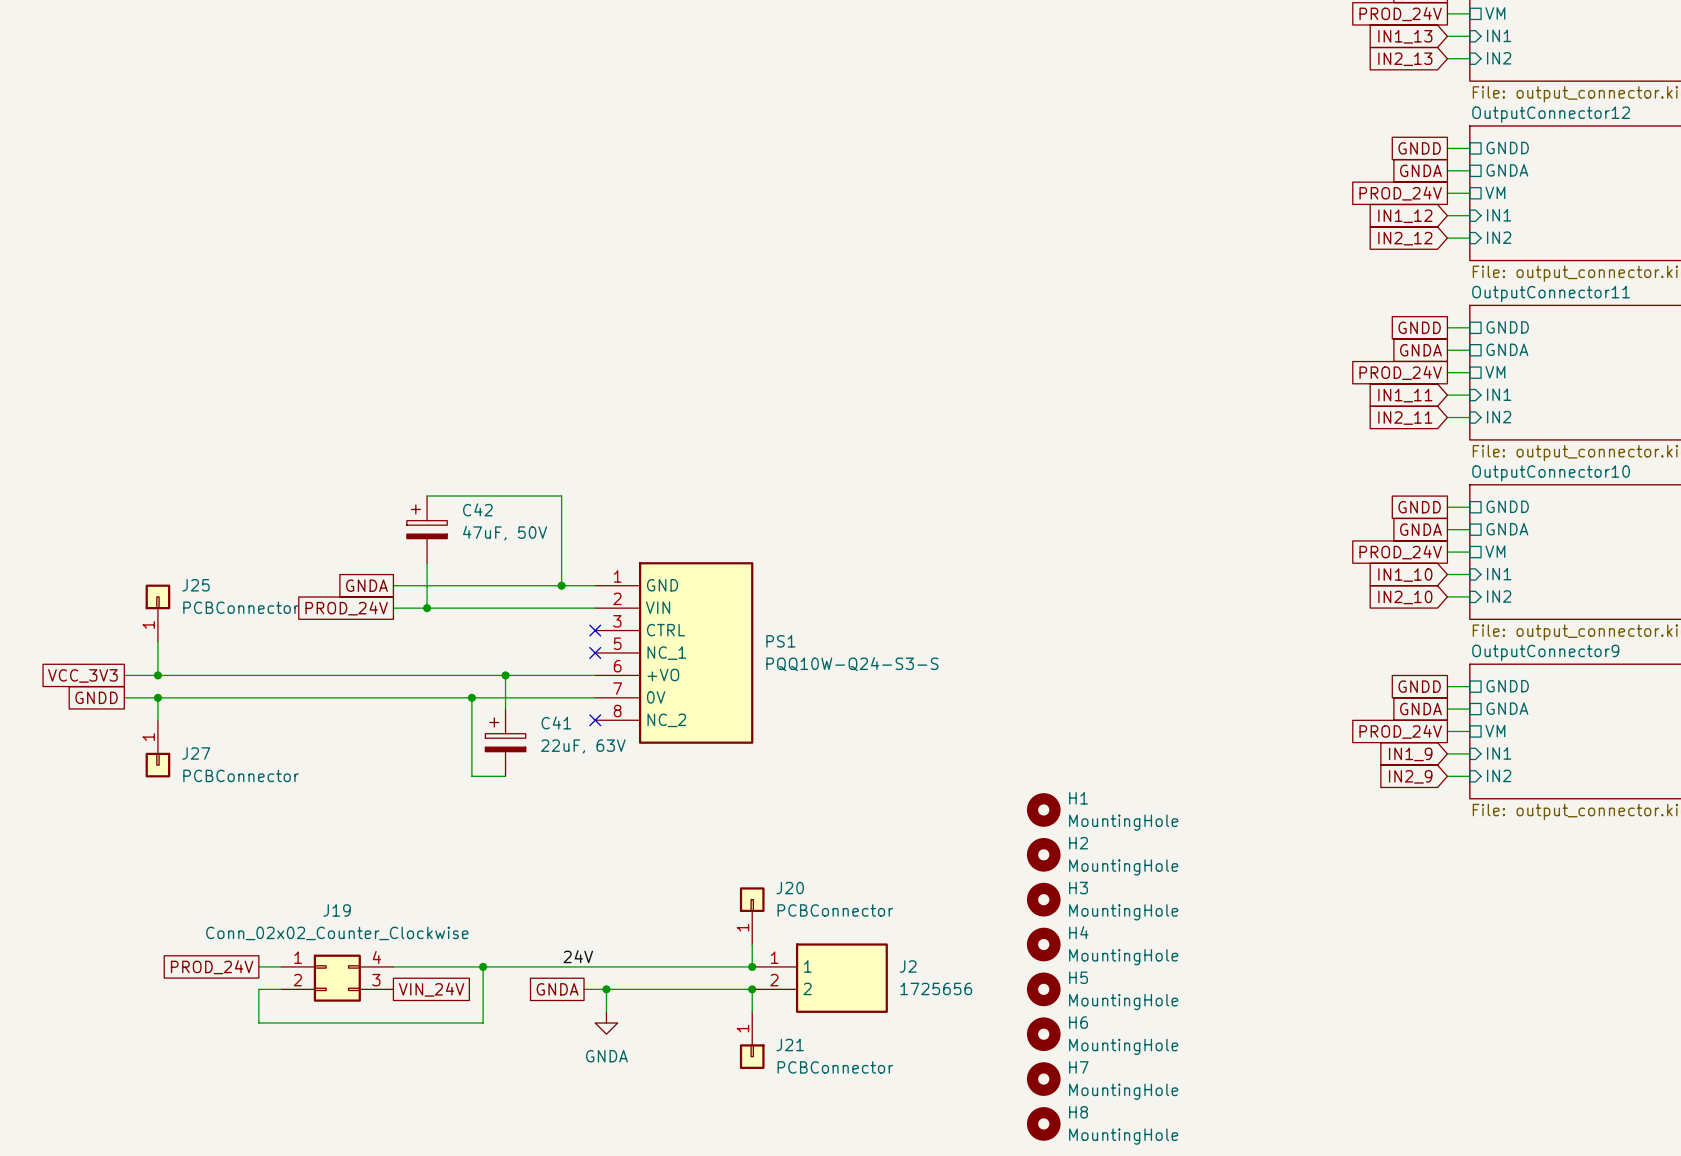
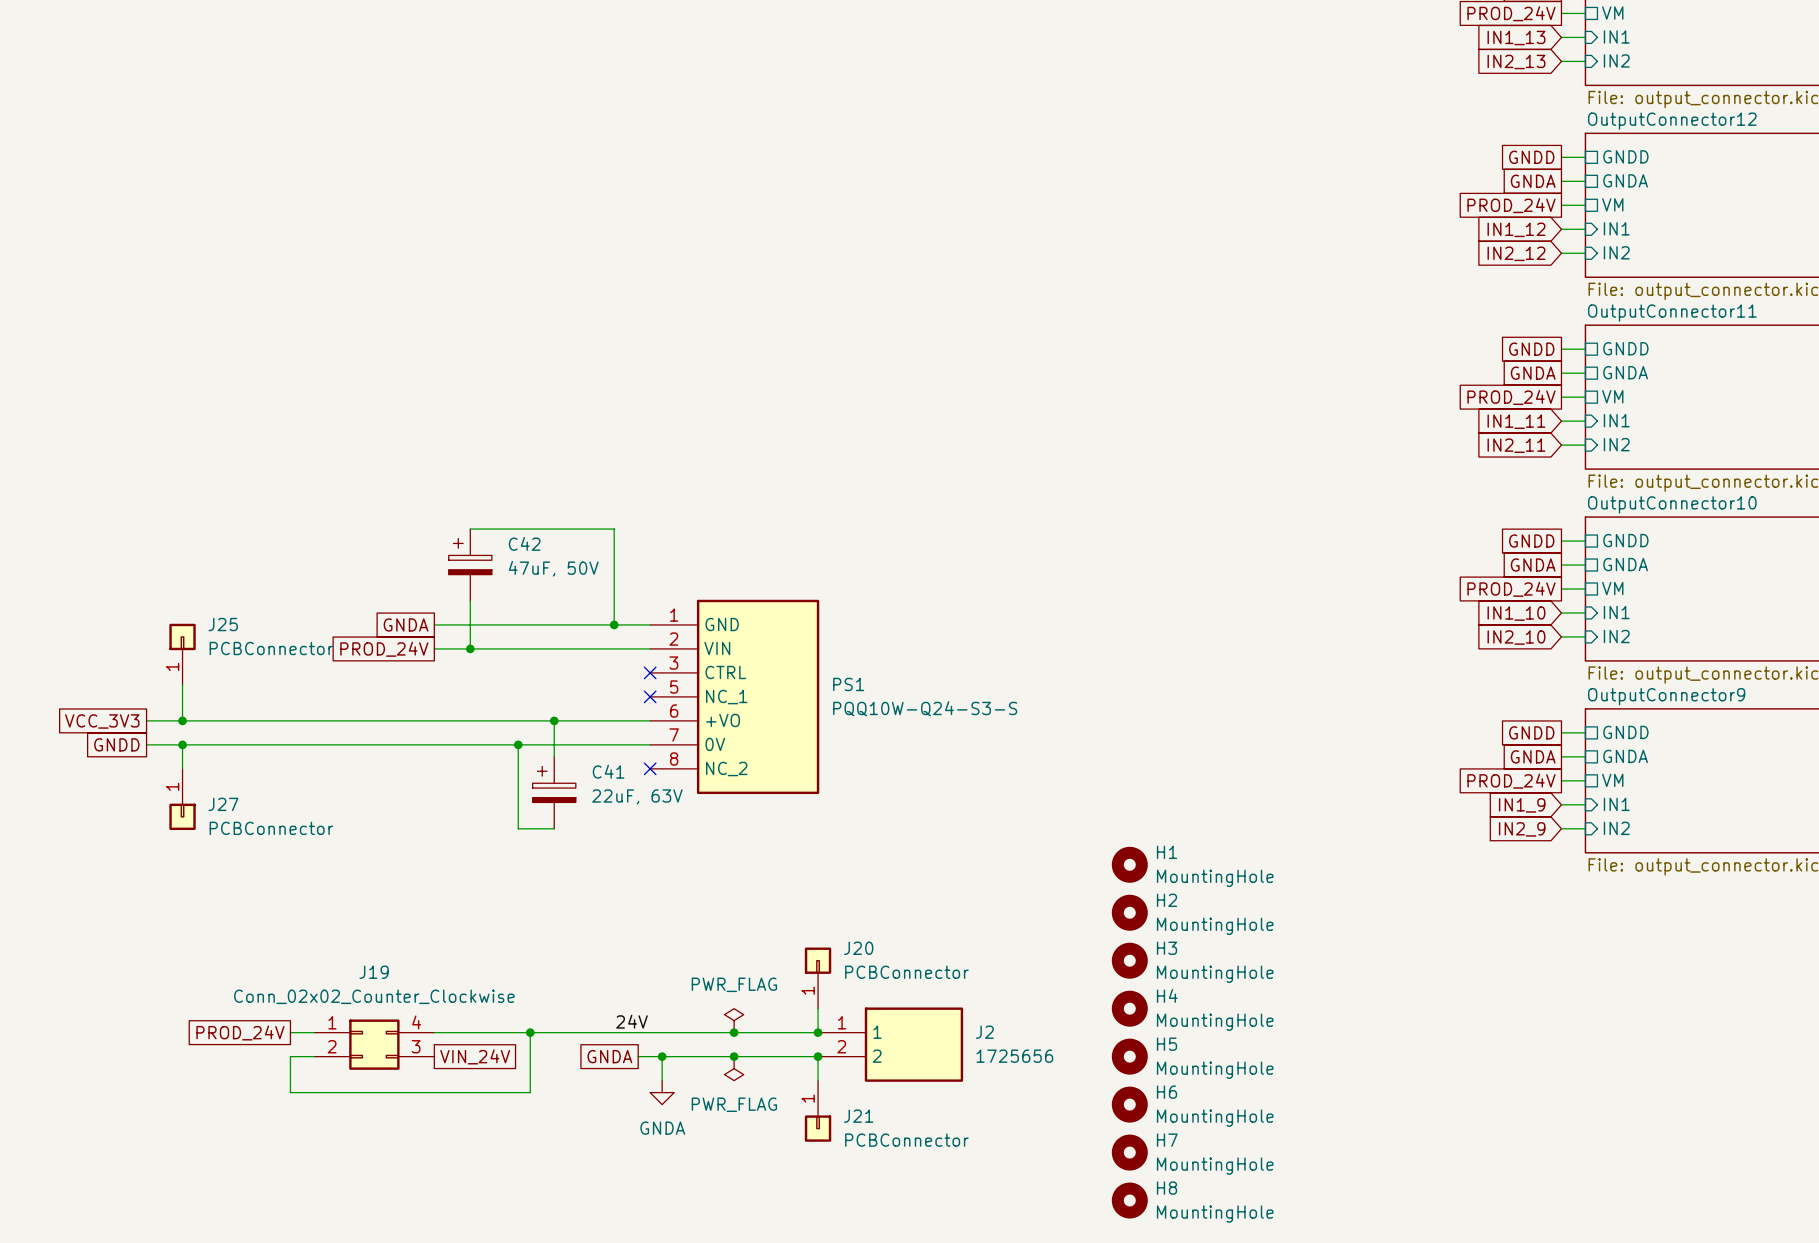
power symbol: none -> PWR_FLAG (734, 1020)
junction: none -> (734, 1032)
junction: none -> (734, 1056)
power symbol: none -> PWR_FLAG (734, 1068)

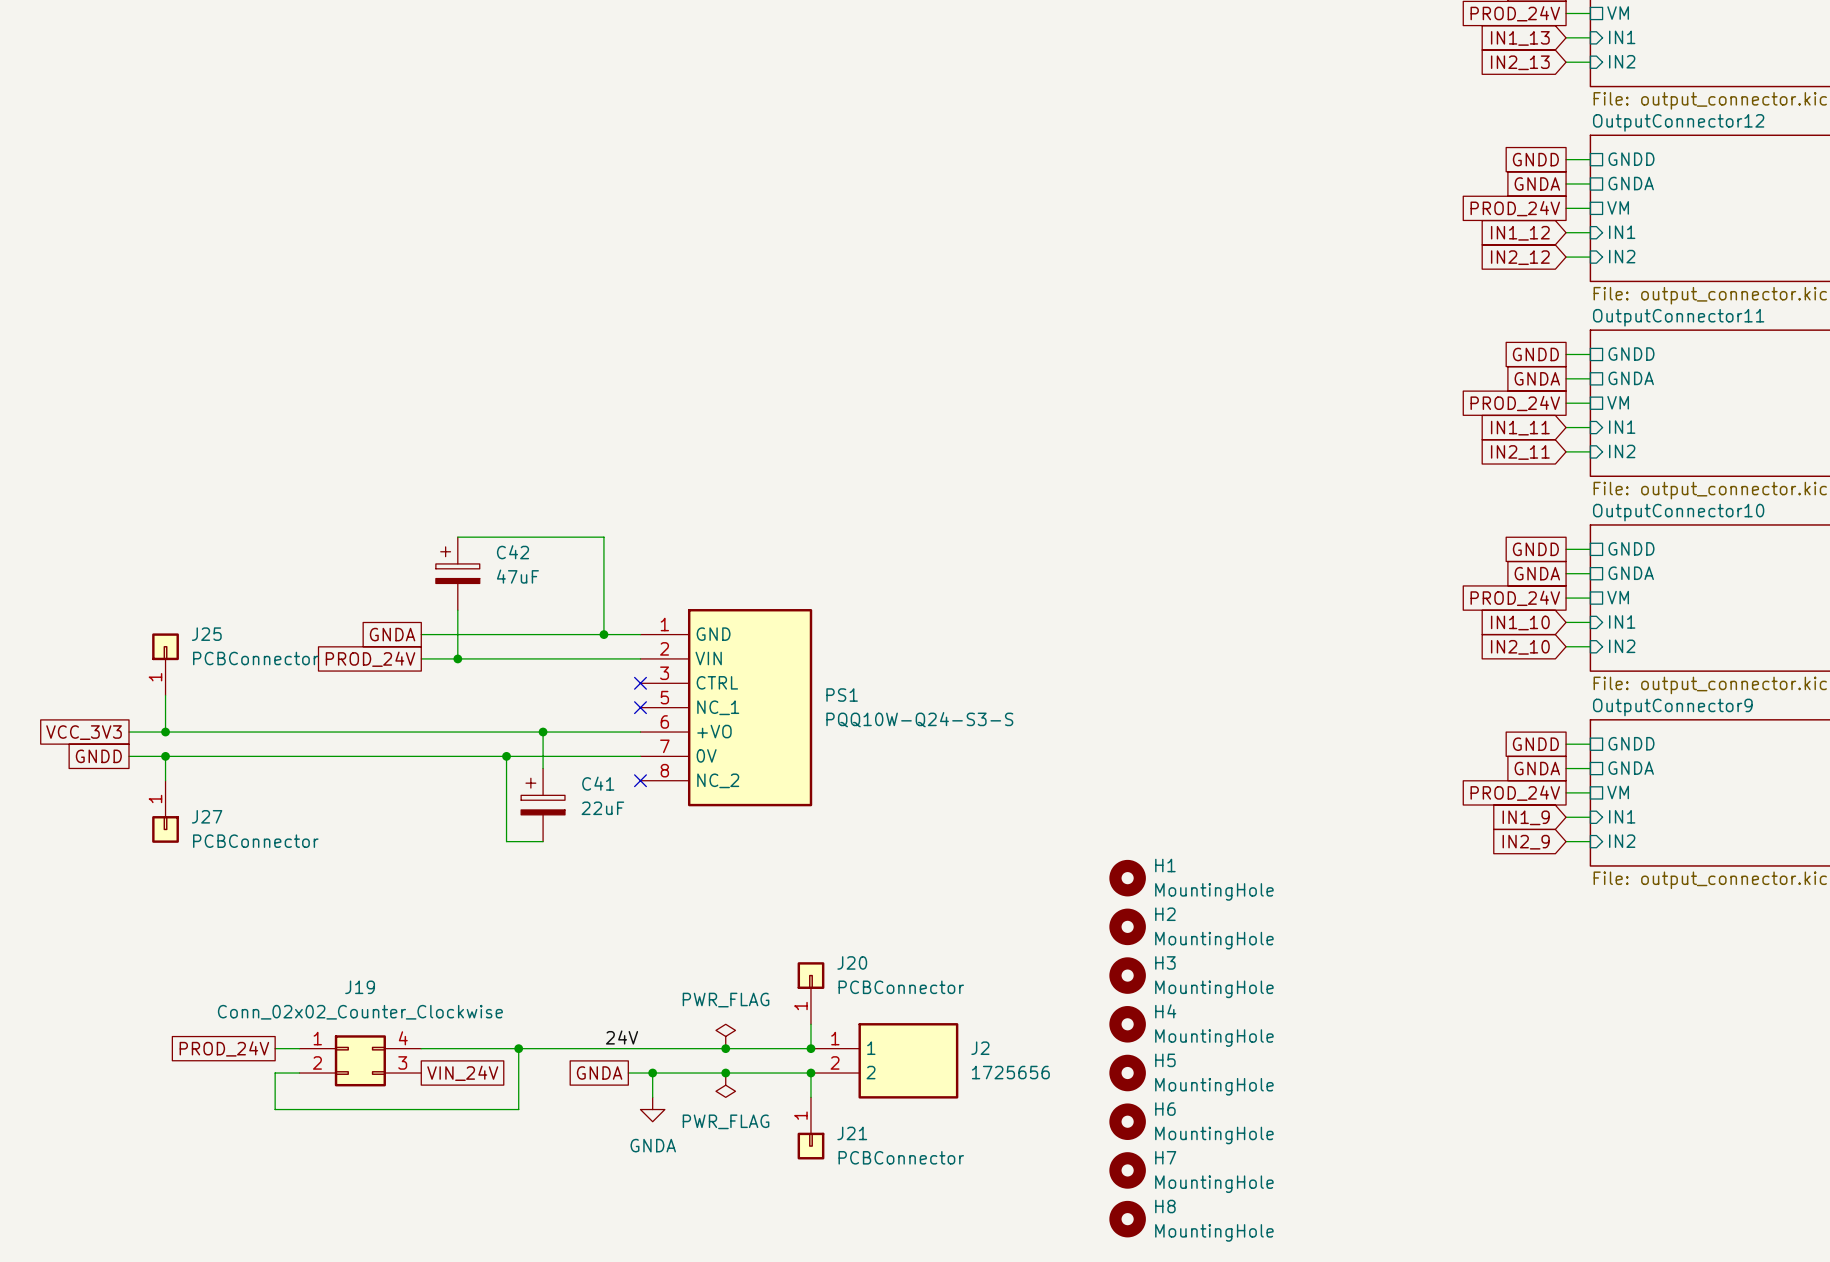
C42 value: 47uF, 50V (553, 568) -> 47uF (517, 576)
C41 value: 22uF, 63V (637, 796) -> 22uF (602, 808)

